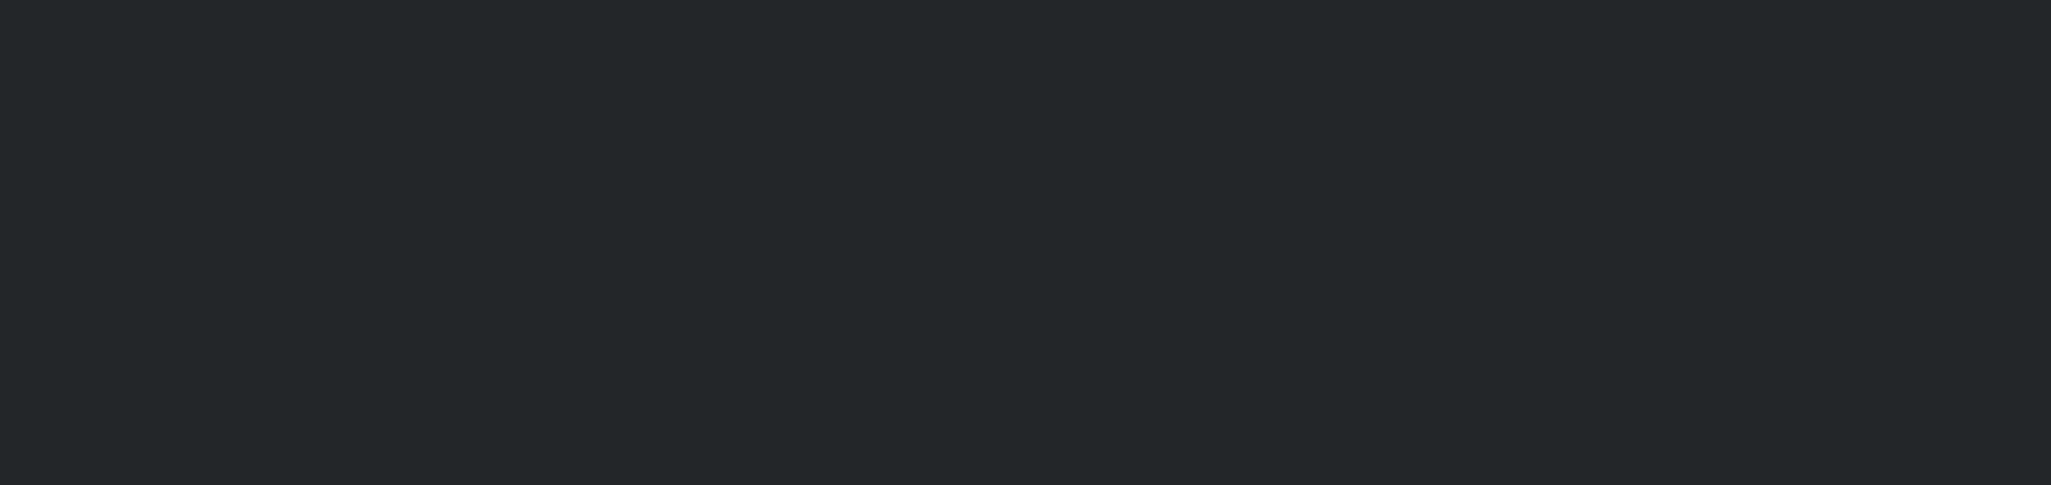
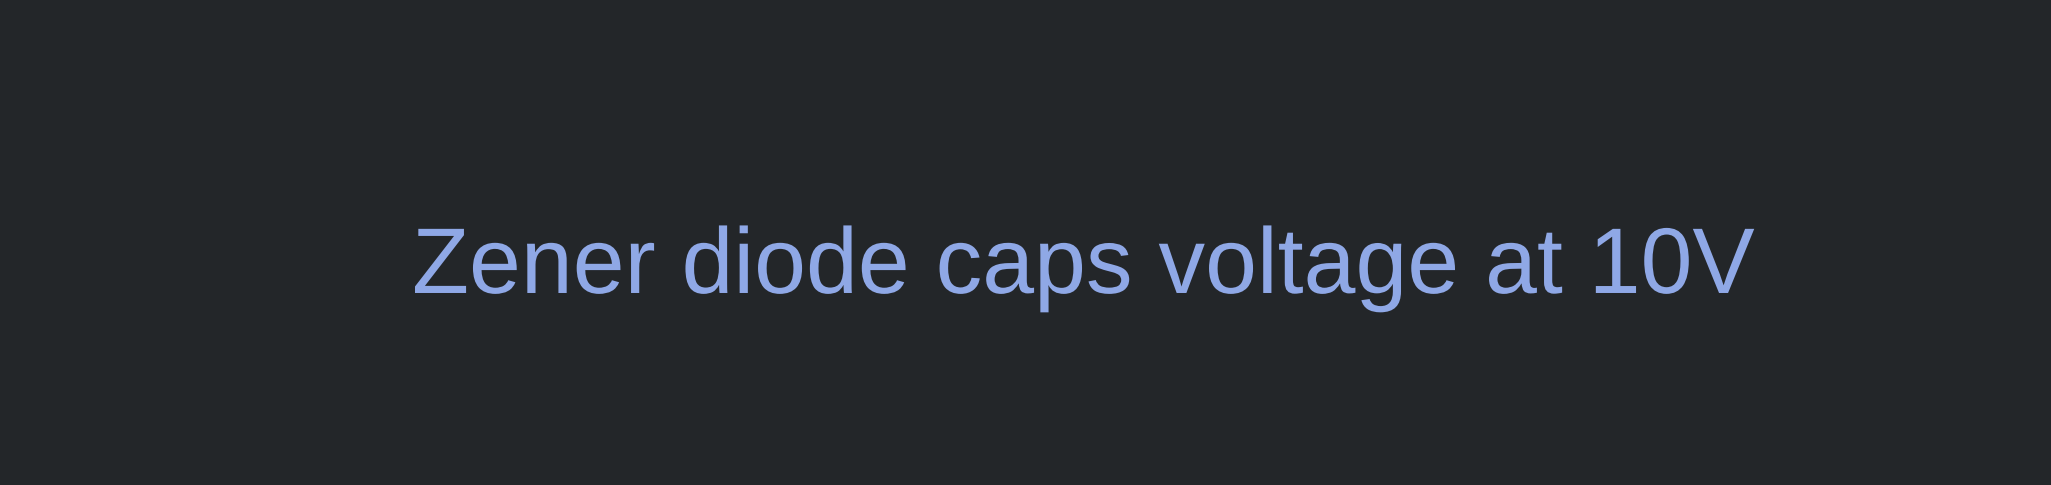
text: none -> Zener diode caps voltage at 10V (1084, 268)

